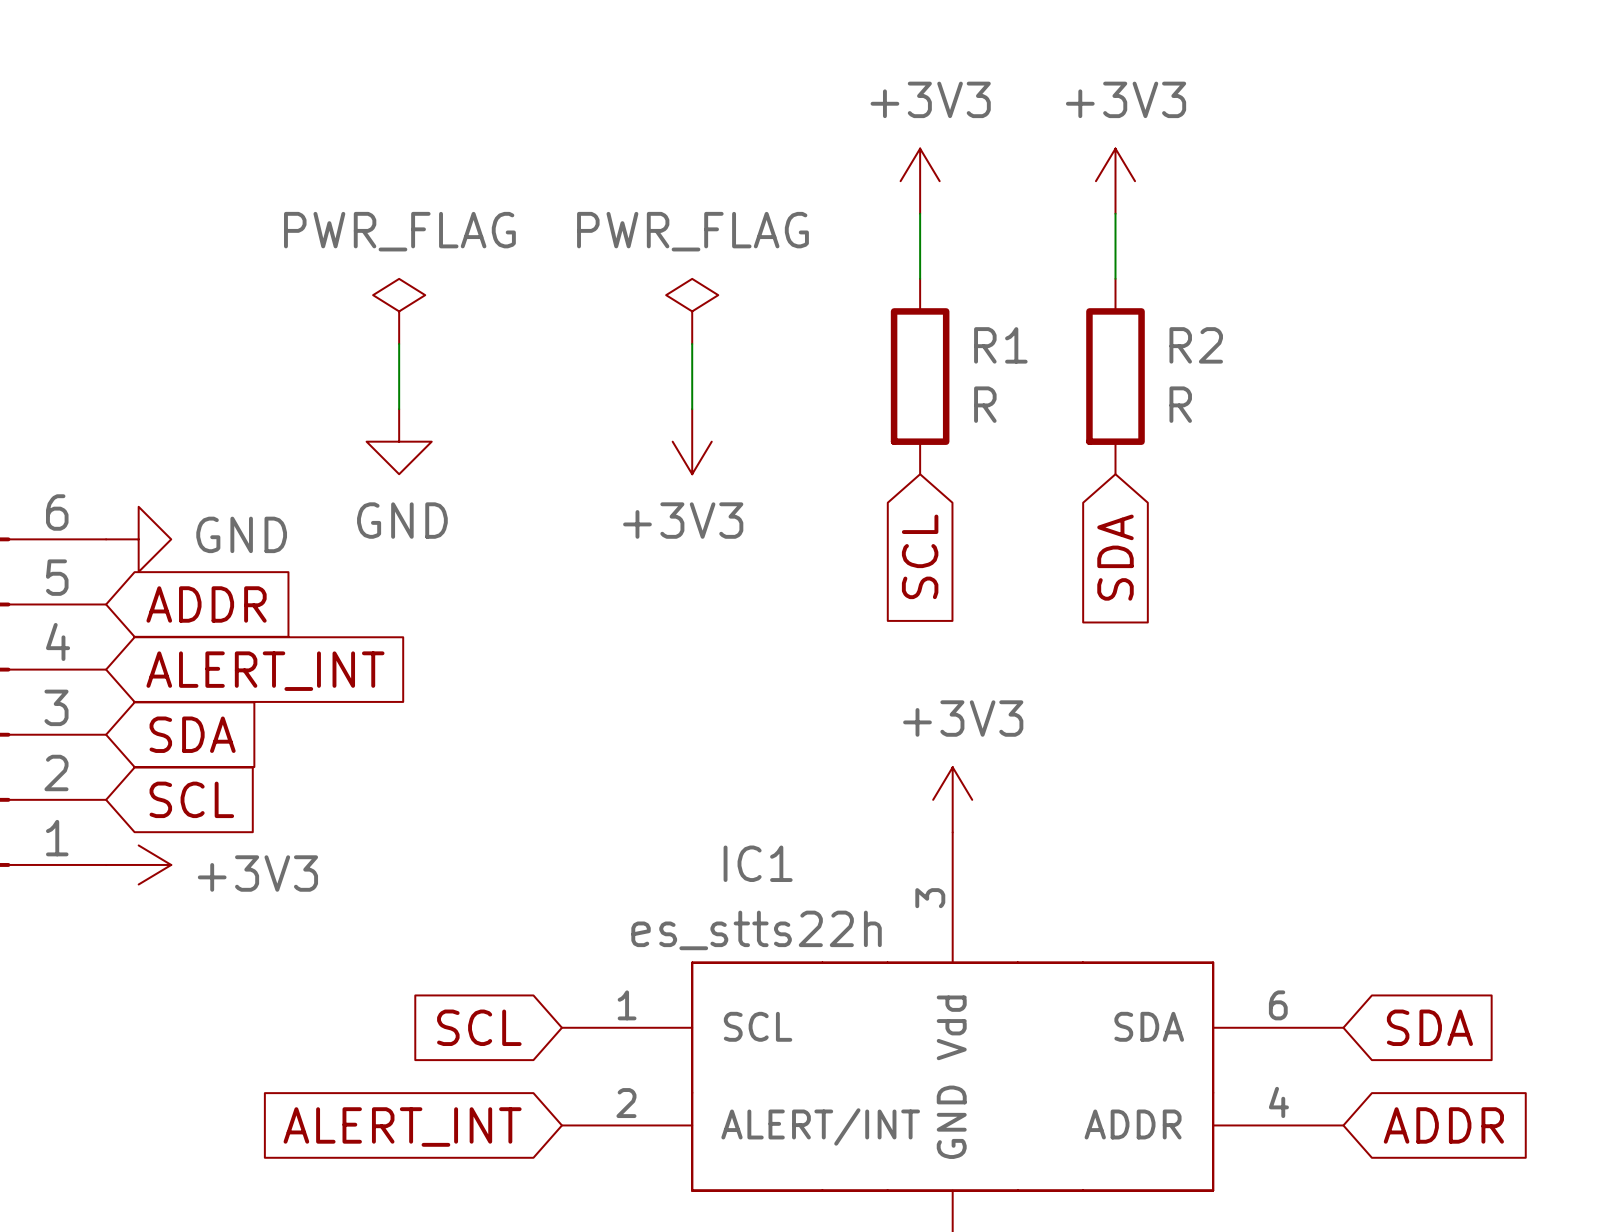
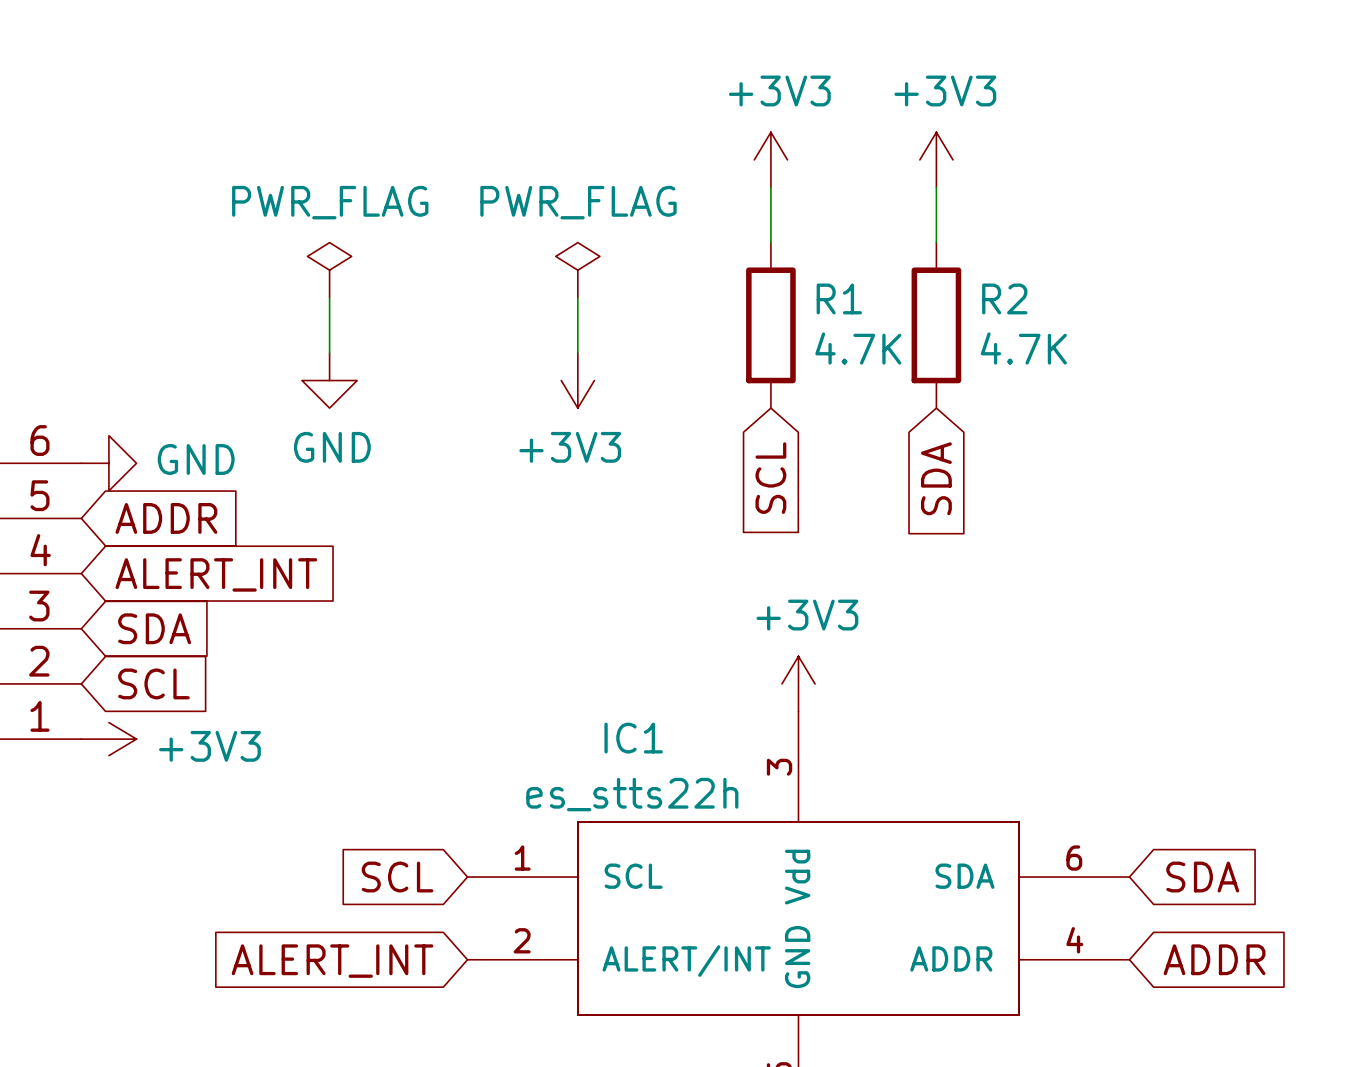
R1 value: R (985, 404) -> 4.7K (858, 348)
R2 value: R (1180, 404) -> 4.7K (1023, 348)

